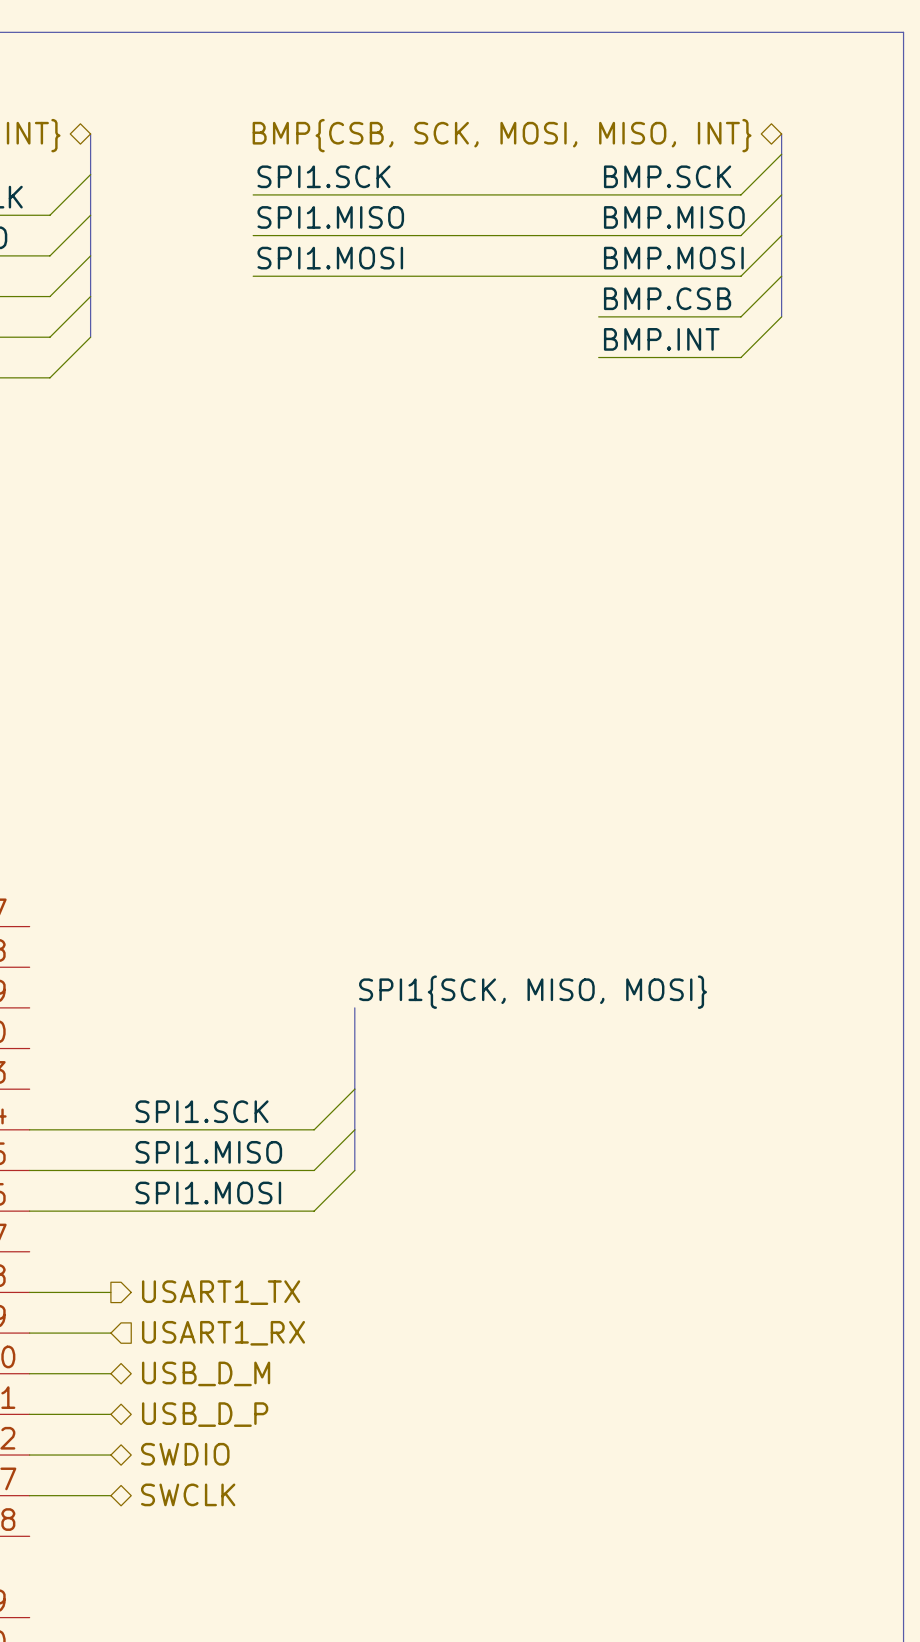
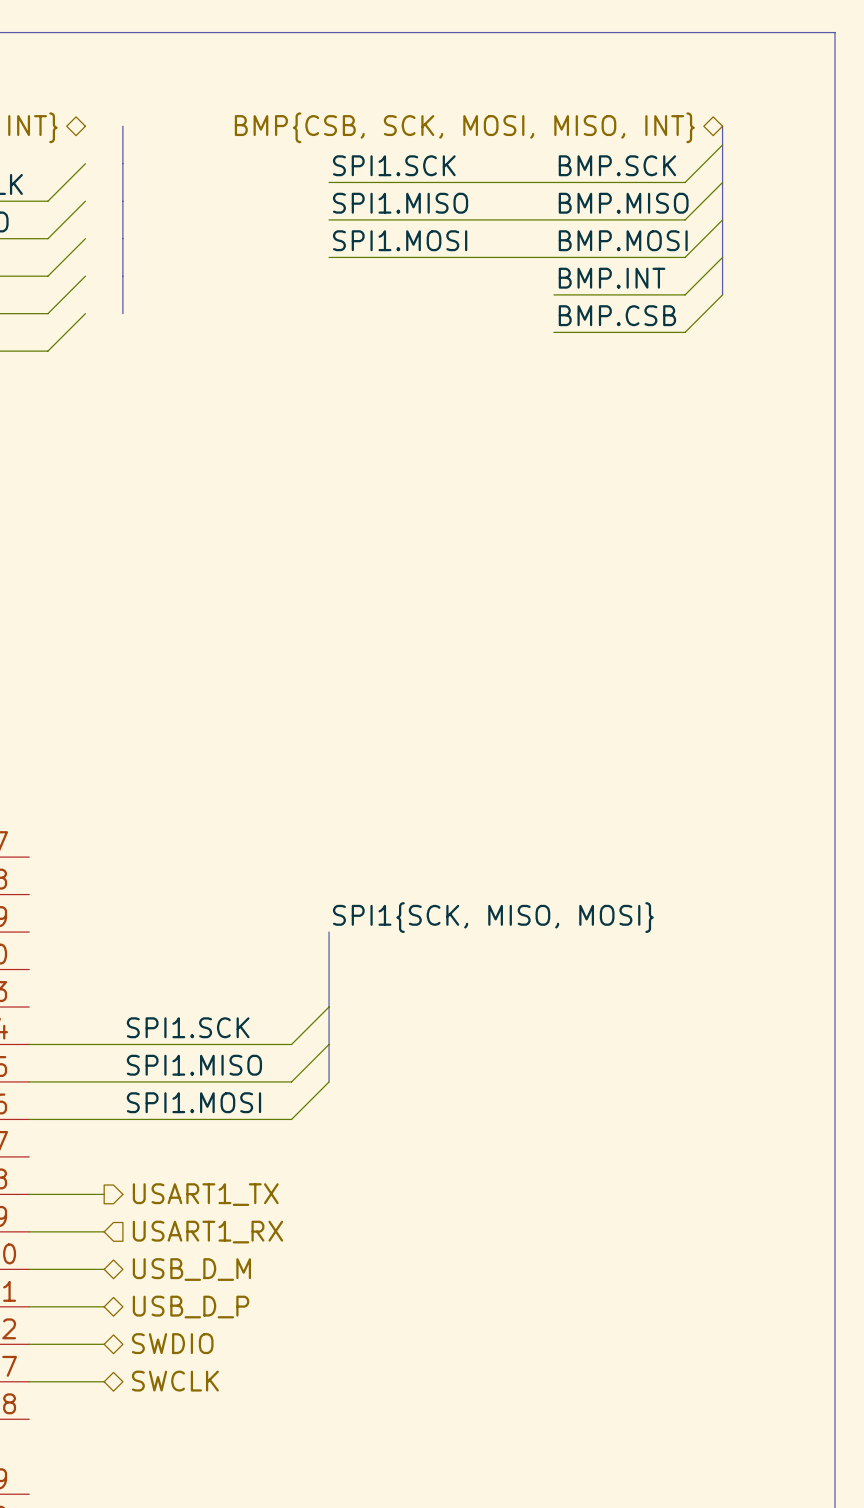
bus: (90, 133) (90, 337) -> (122, 126) (122, 313)
label position: SPI1.SCK (323, 176) -> SPI1.SCK (394, 165)
wire: (253, 194) (354, 194) -> none
label position: SPI1.MISO (330, 217) -> SPI1.MISO (400, 203)
wire: (253, 235) (354, 235) -> none
label position: SPI1.MOSI (330, 258) -> SPI1.MOSI (400, 240)
wire: (253, 276) (354, 276) -> none
label: BMP.CSB (667, 298) -> BMP.INT (612, 278)
label: BMP.INT (661, 339) -> BMP.CSB (617, 315)

